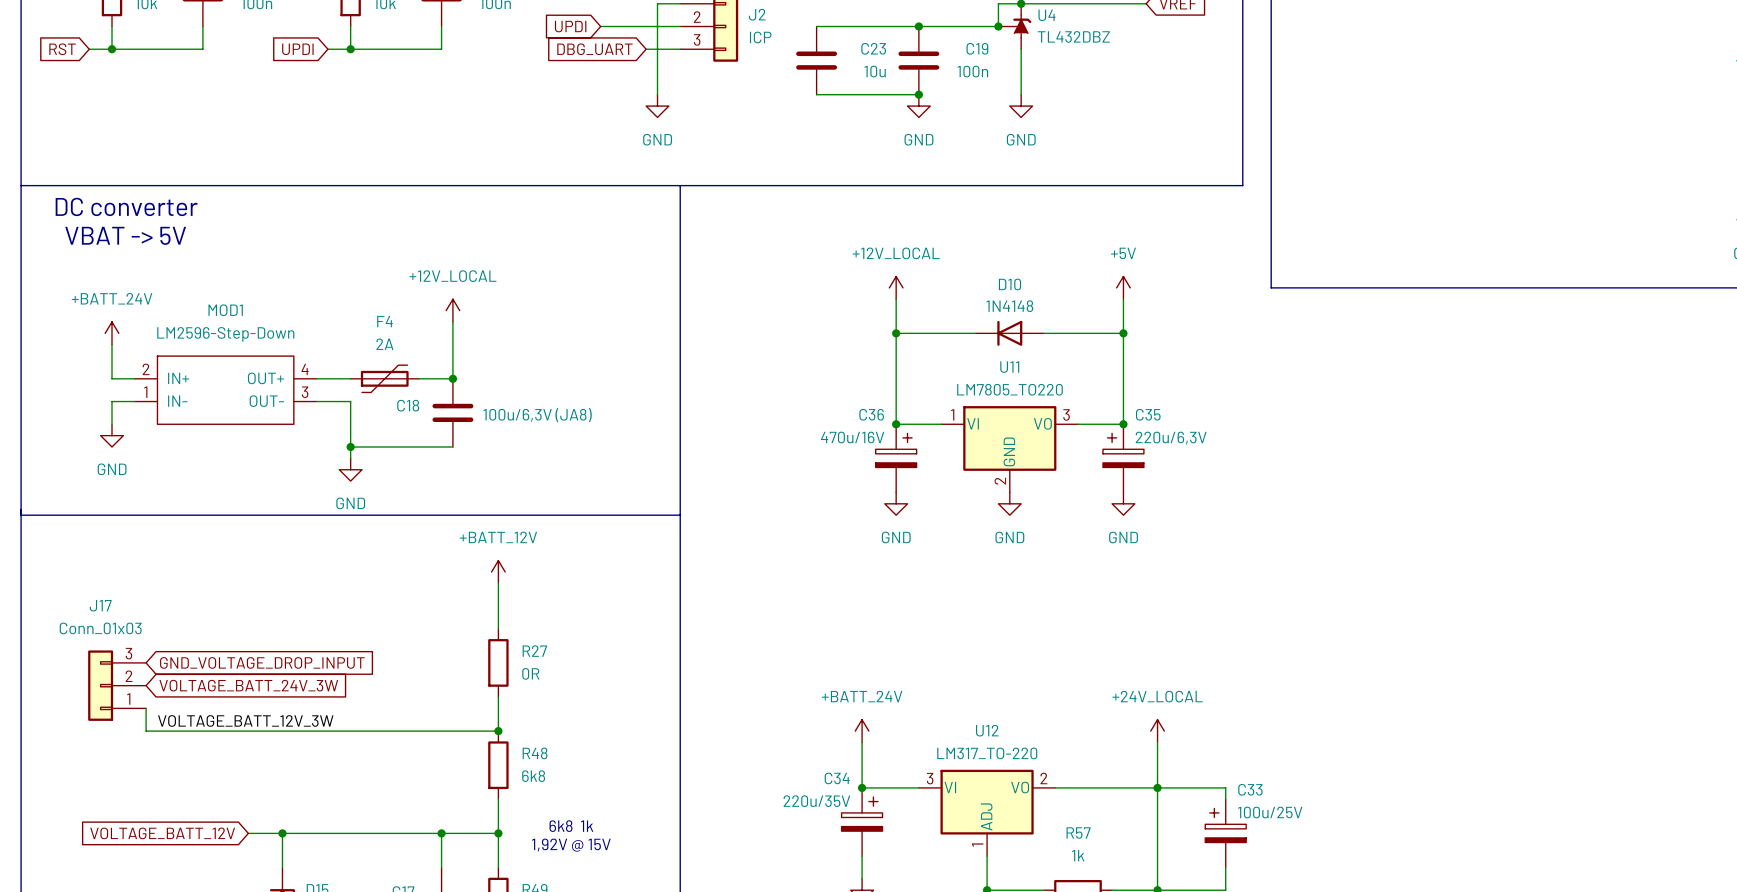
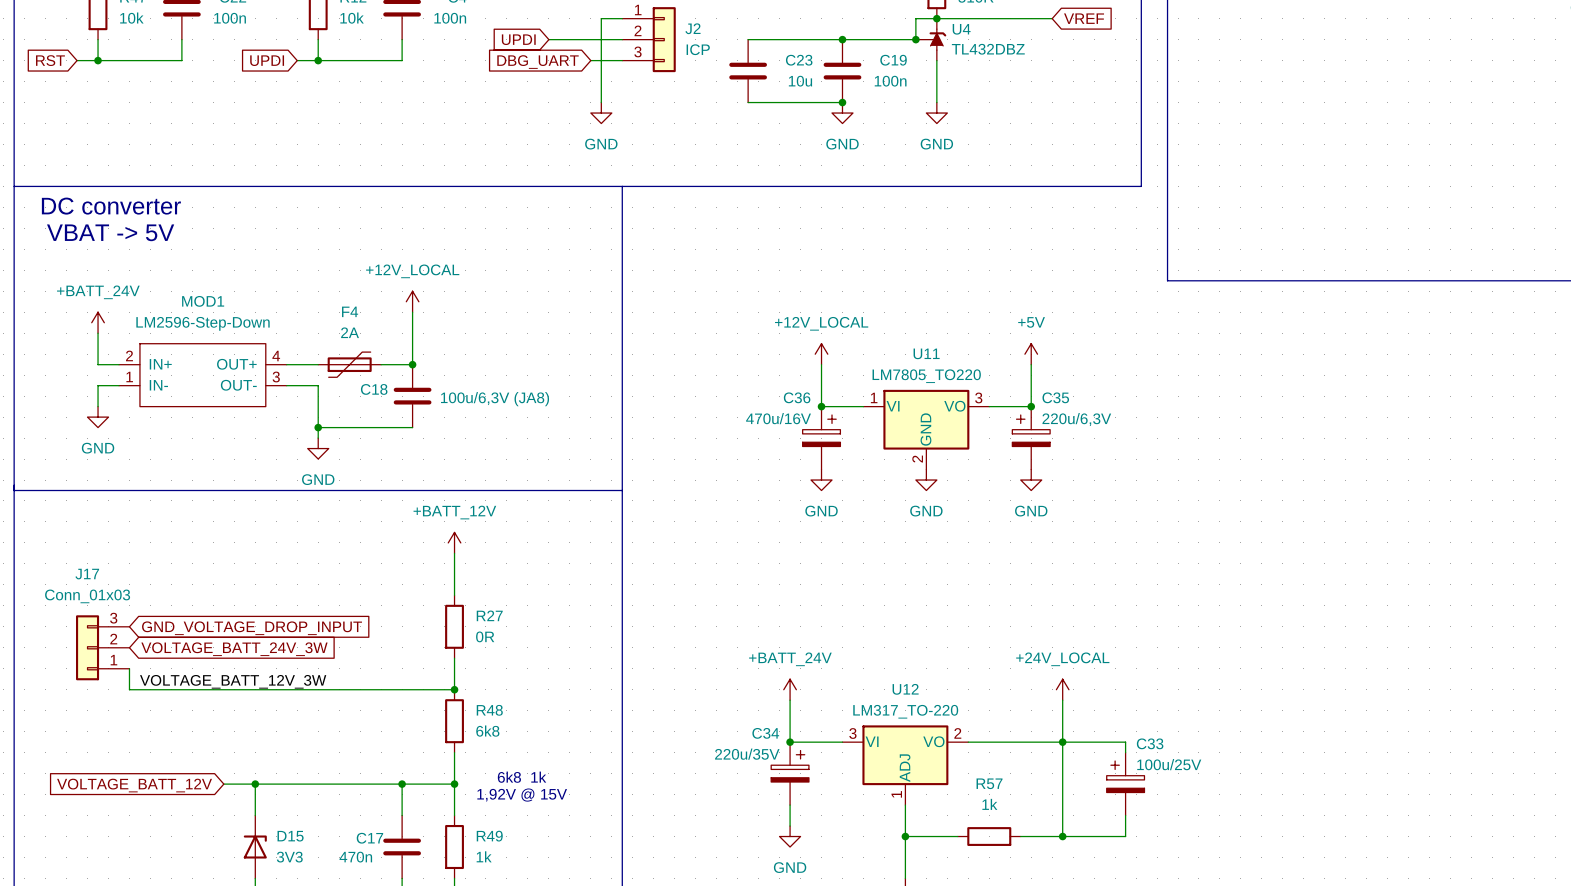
power symbol position: +12V_LOCAL (896, 287) -> +12V_LOCAL (821, 354)
power symbol position: +5V (1123, 287) -> +5V (1031, 354)
wire: (896, 299) (896, 378) -> none
wire: (1123, 299) (1123, 378) -> none
wire: (896, 333) (975, 333) -> none
junction: (896, 333) -> none
D10: 1N4148 (1009, 333) -> none
wire: (1043, 333) (1123, 333) -> none
junction: (1123, 333) -> none

